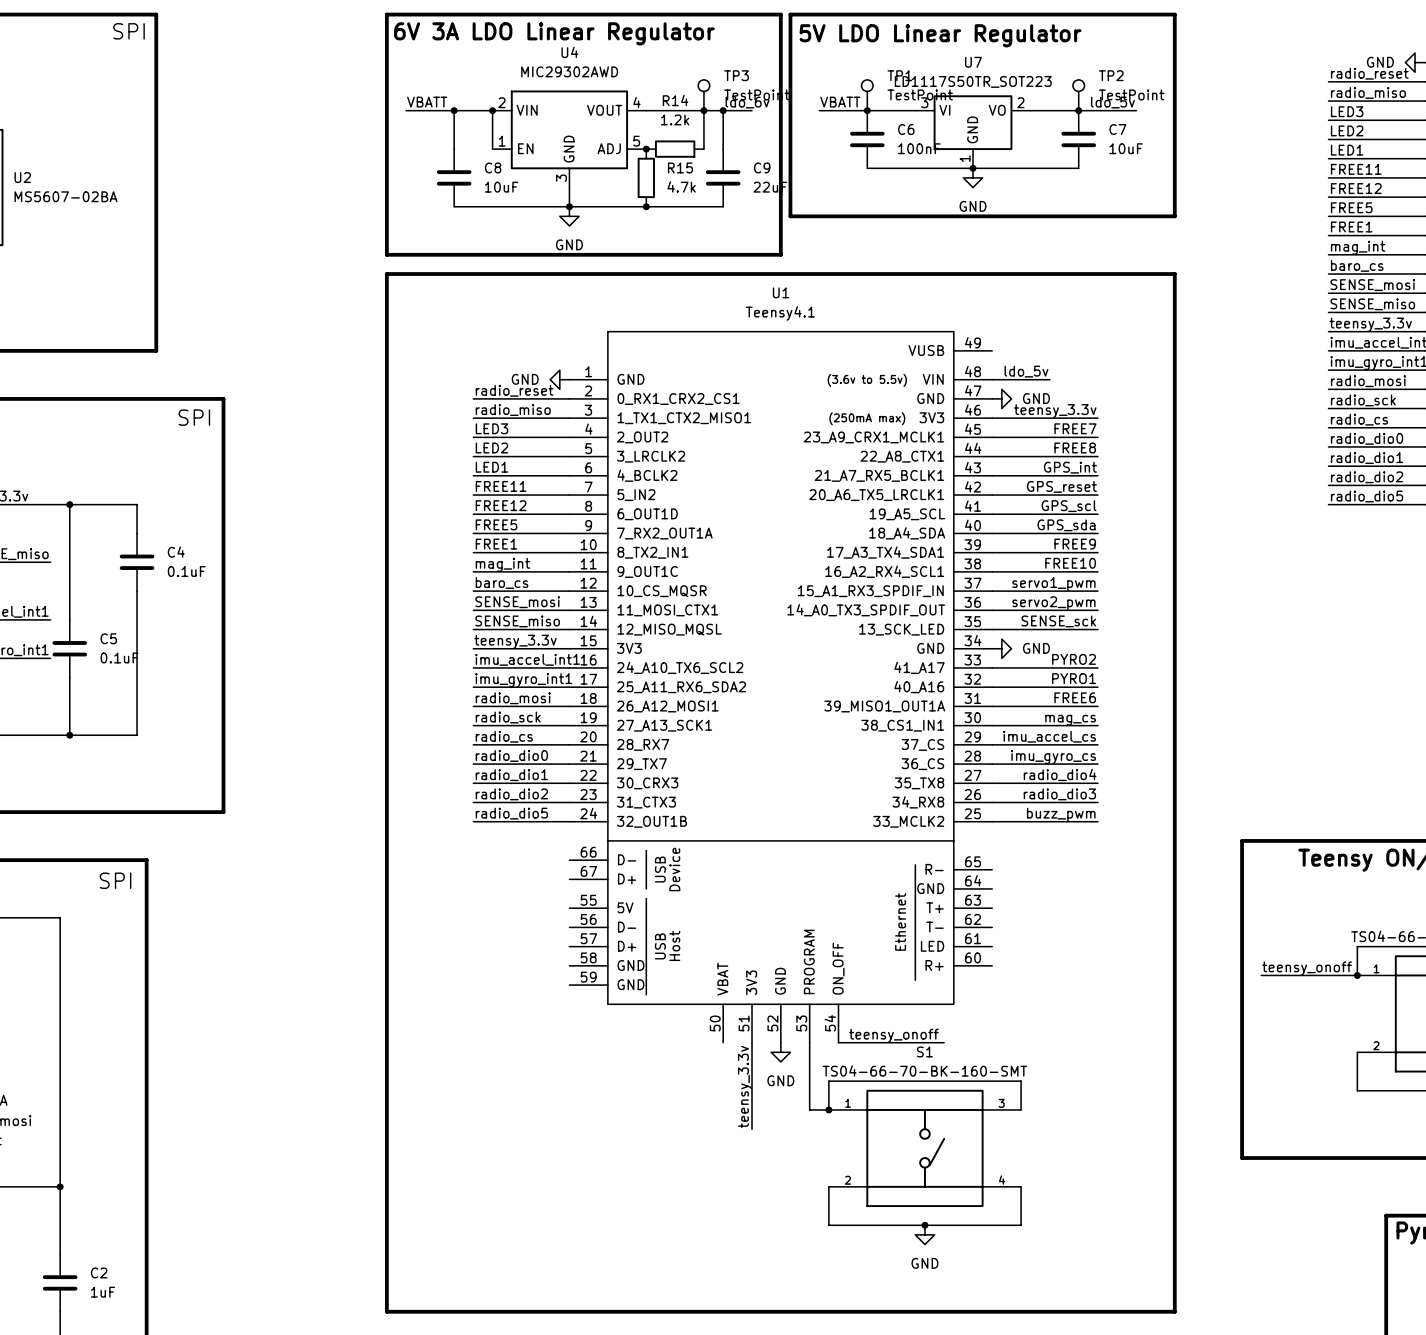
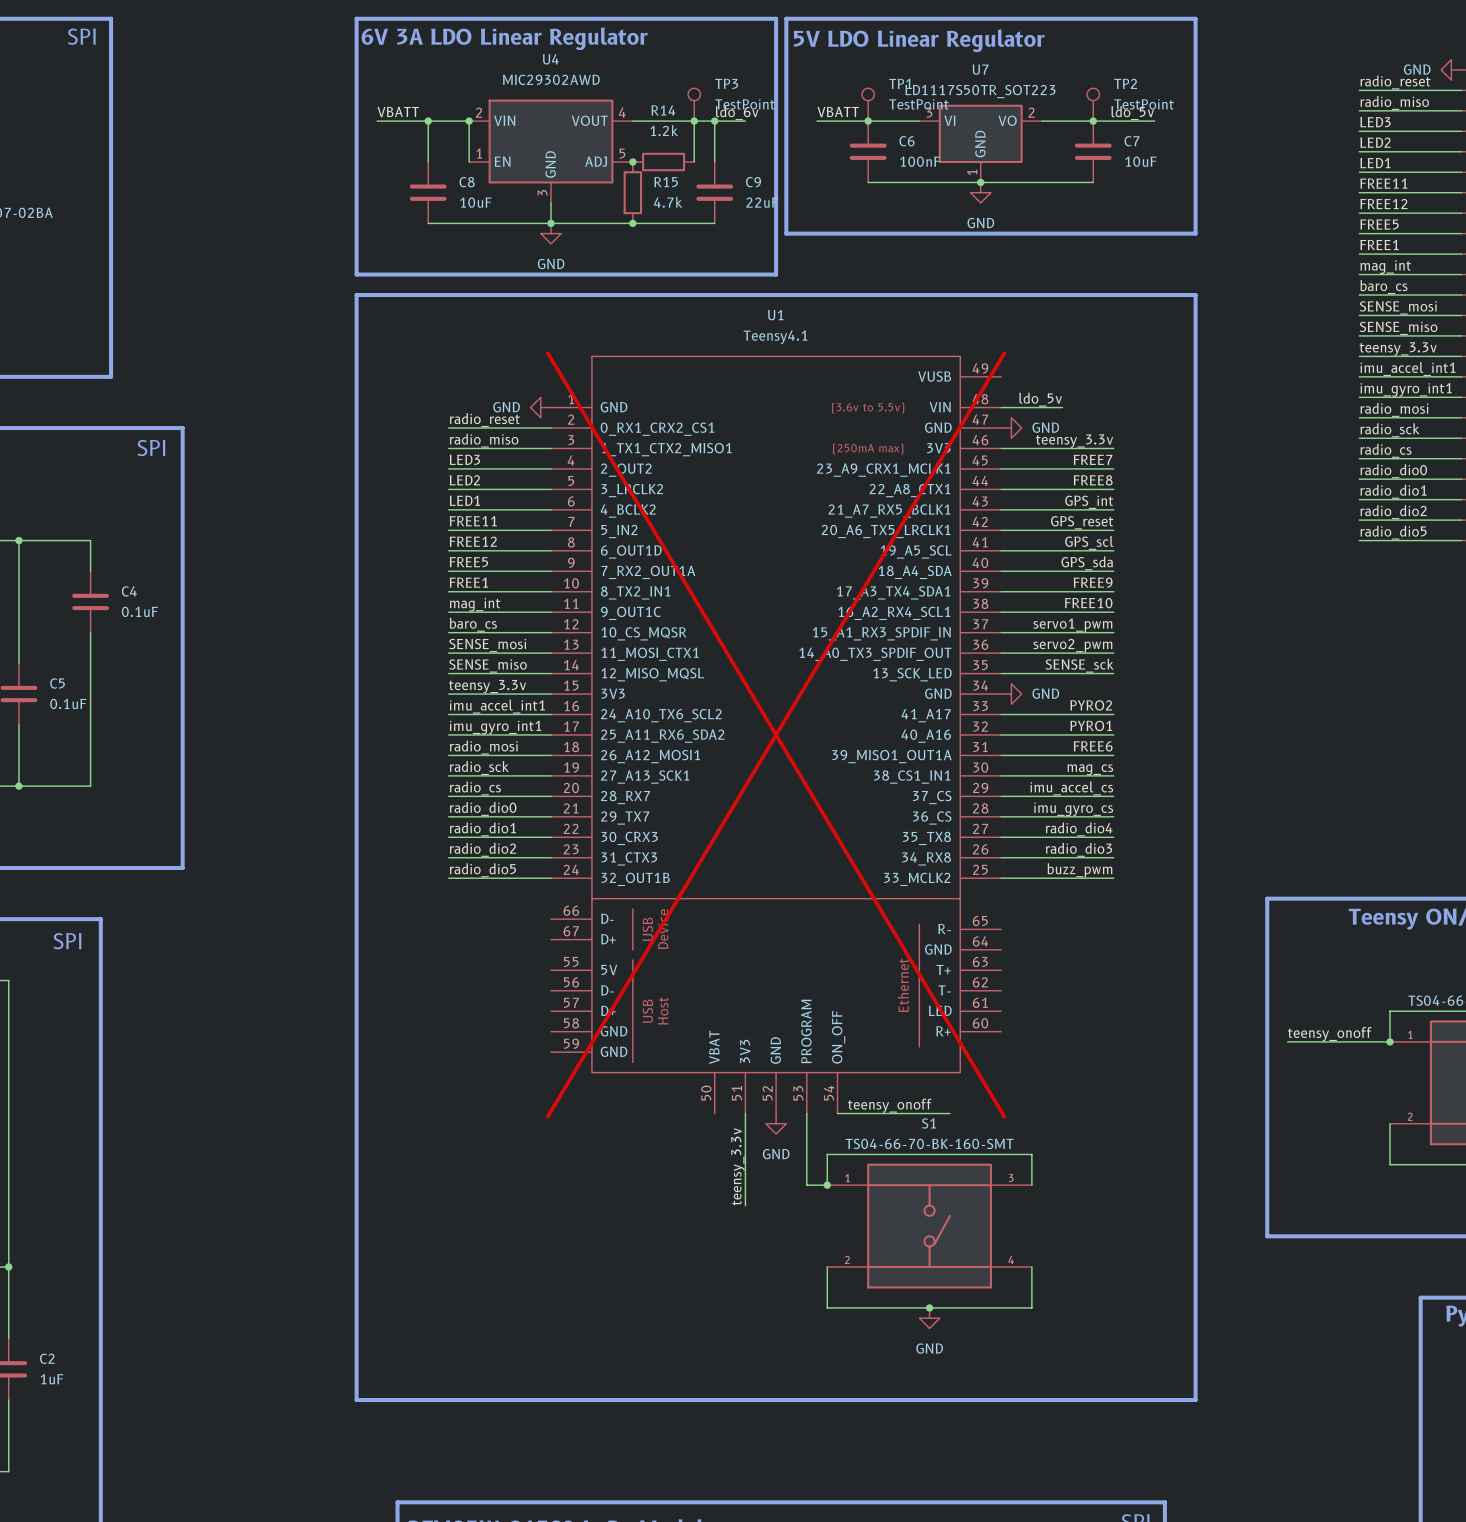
U1 do-not-place cross: none -> (776, 734)

